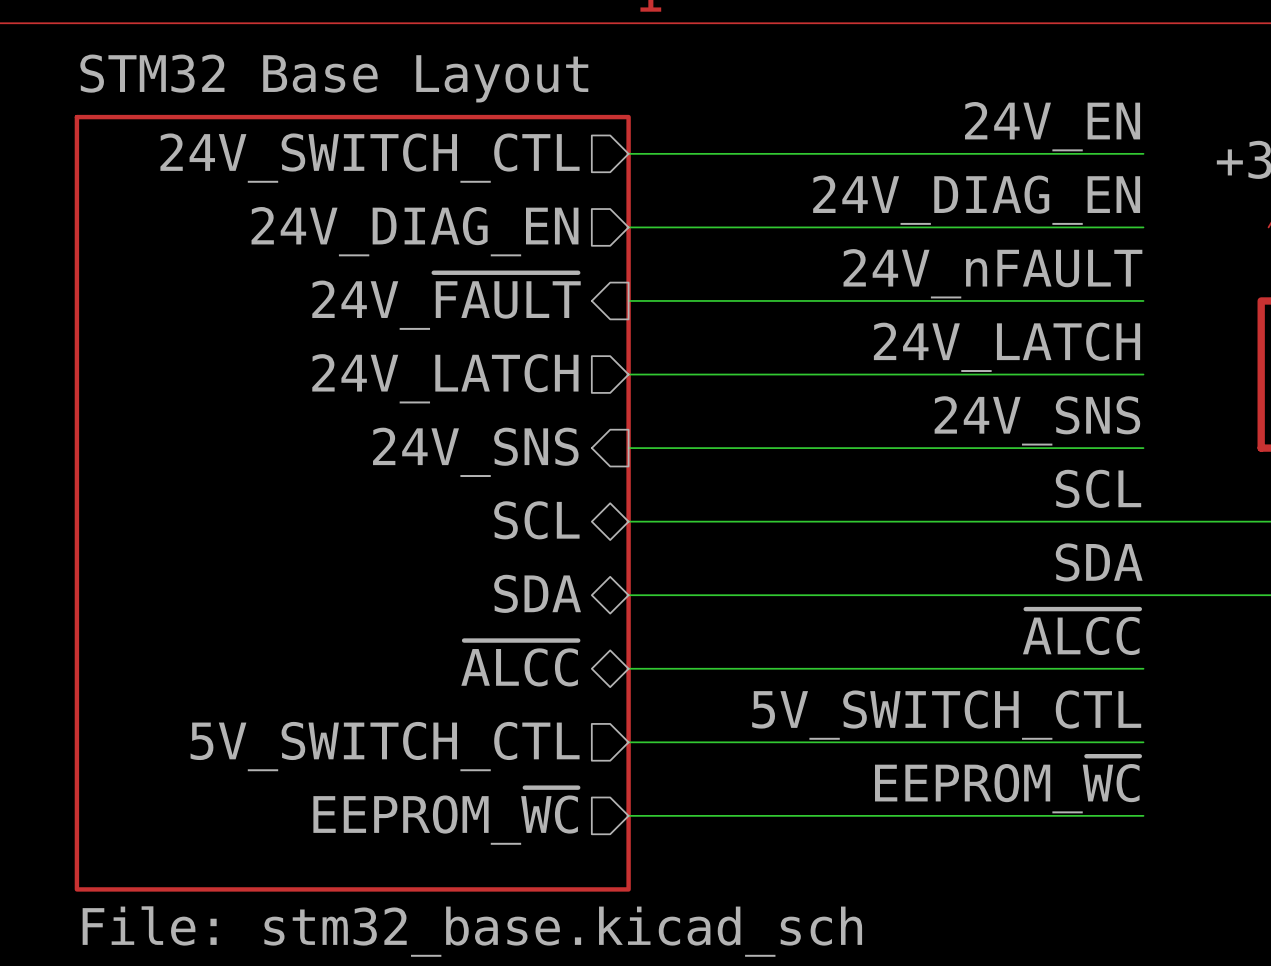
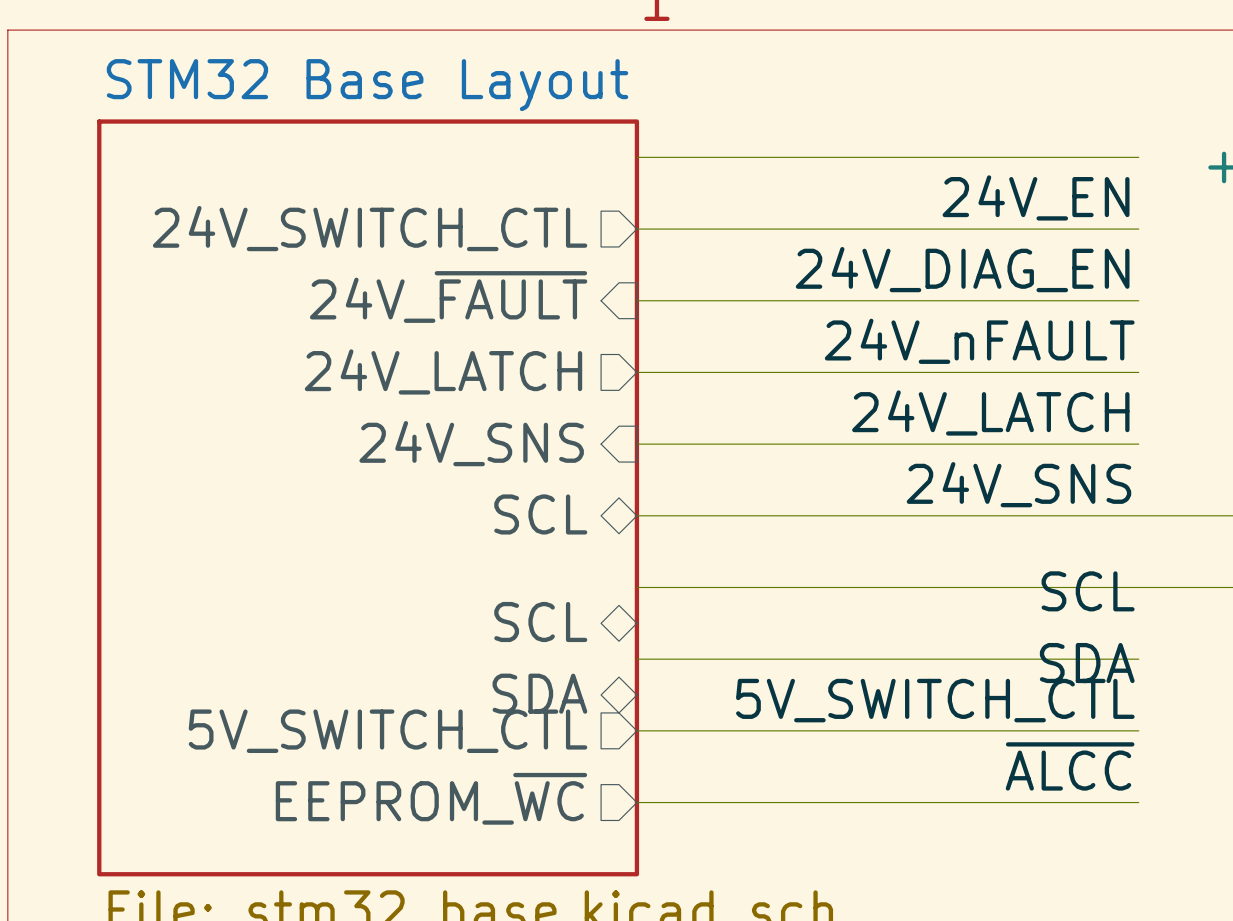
label: 24V_EN (1052, 126) -> none
sheet pin: 24V_SWITCH_CTL (370, 158) -> none
label: 24V_DIAG_EN (976, 200) -> 24V_EN (1036, 197)
sheet pin: 24V_DIAG_EN (415, 231) -> 24V_SWITCH_CTL (370, 228)
label: 24V_nFAULT (992, 273) -> 24V_DIAG_EN (962, 269)
label: 24V_LATCH (1007, 347) -> 24V_nFAULT (979, 341)
label: 24V_SNS (1037, 420) -> 24V_LATCH (990, 412)
label: SCL (1098, 488) -> 24V_SNS (1018, 484)
label position: SDA (1099, 562) -> SDA (1087, 663)
sheet pin position: SDA (537, 593) -> SDA (539, 693)
label: none -> SCL (1088, 591)
sheet pin: none -> SCL (540, 621)
label: ~{ALCC} (1081, 632) -> none
sheet pin: ~{ALCC} (519, 663) -> none
label: EEPROM_~{WC} (1007, 784) -> ~{ALCC} (1070, 766)

